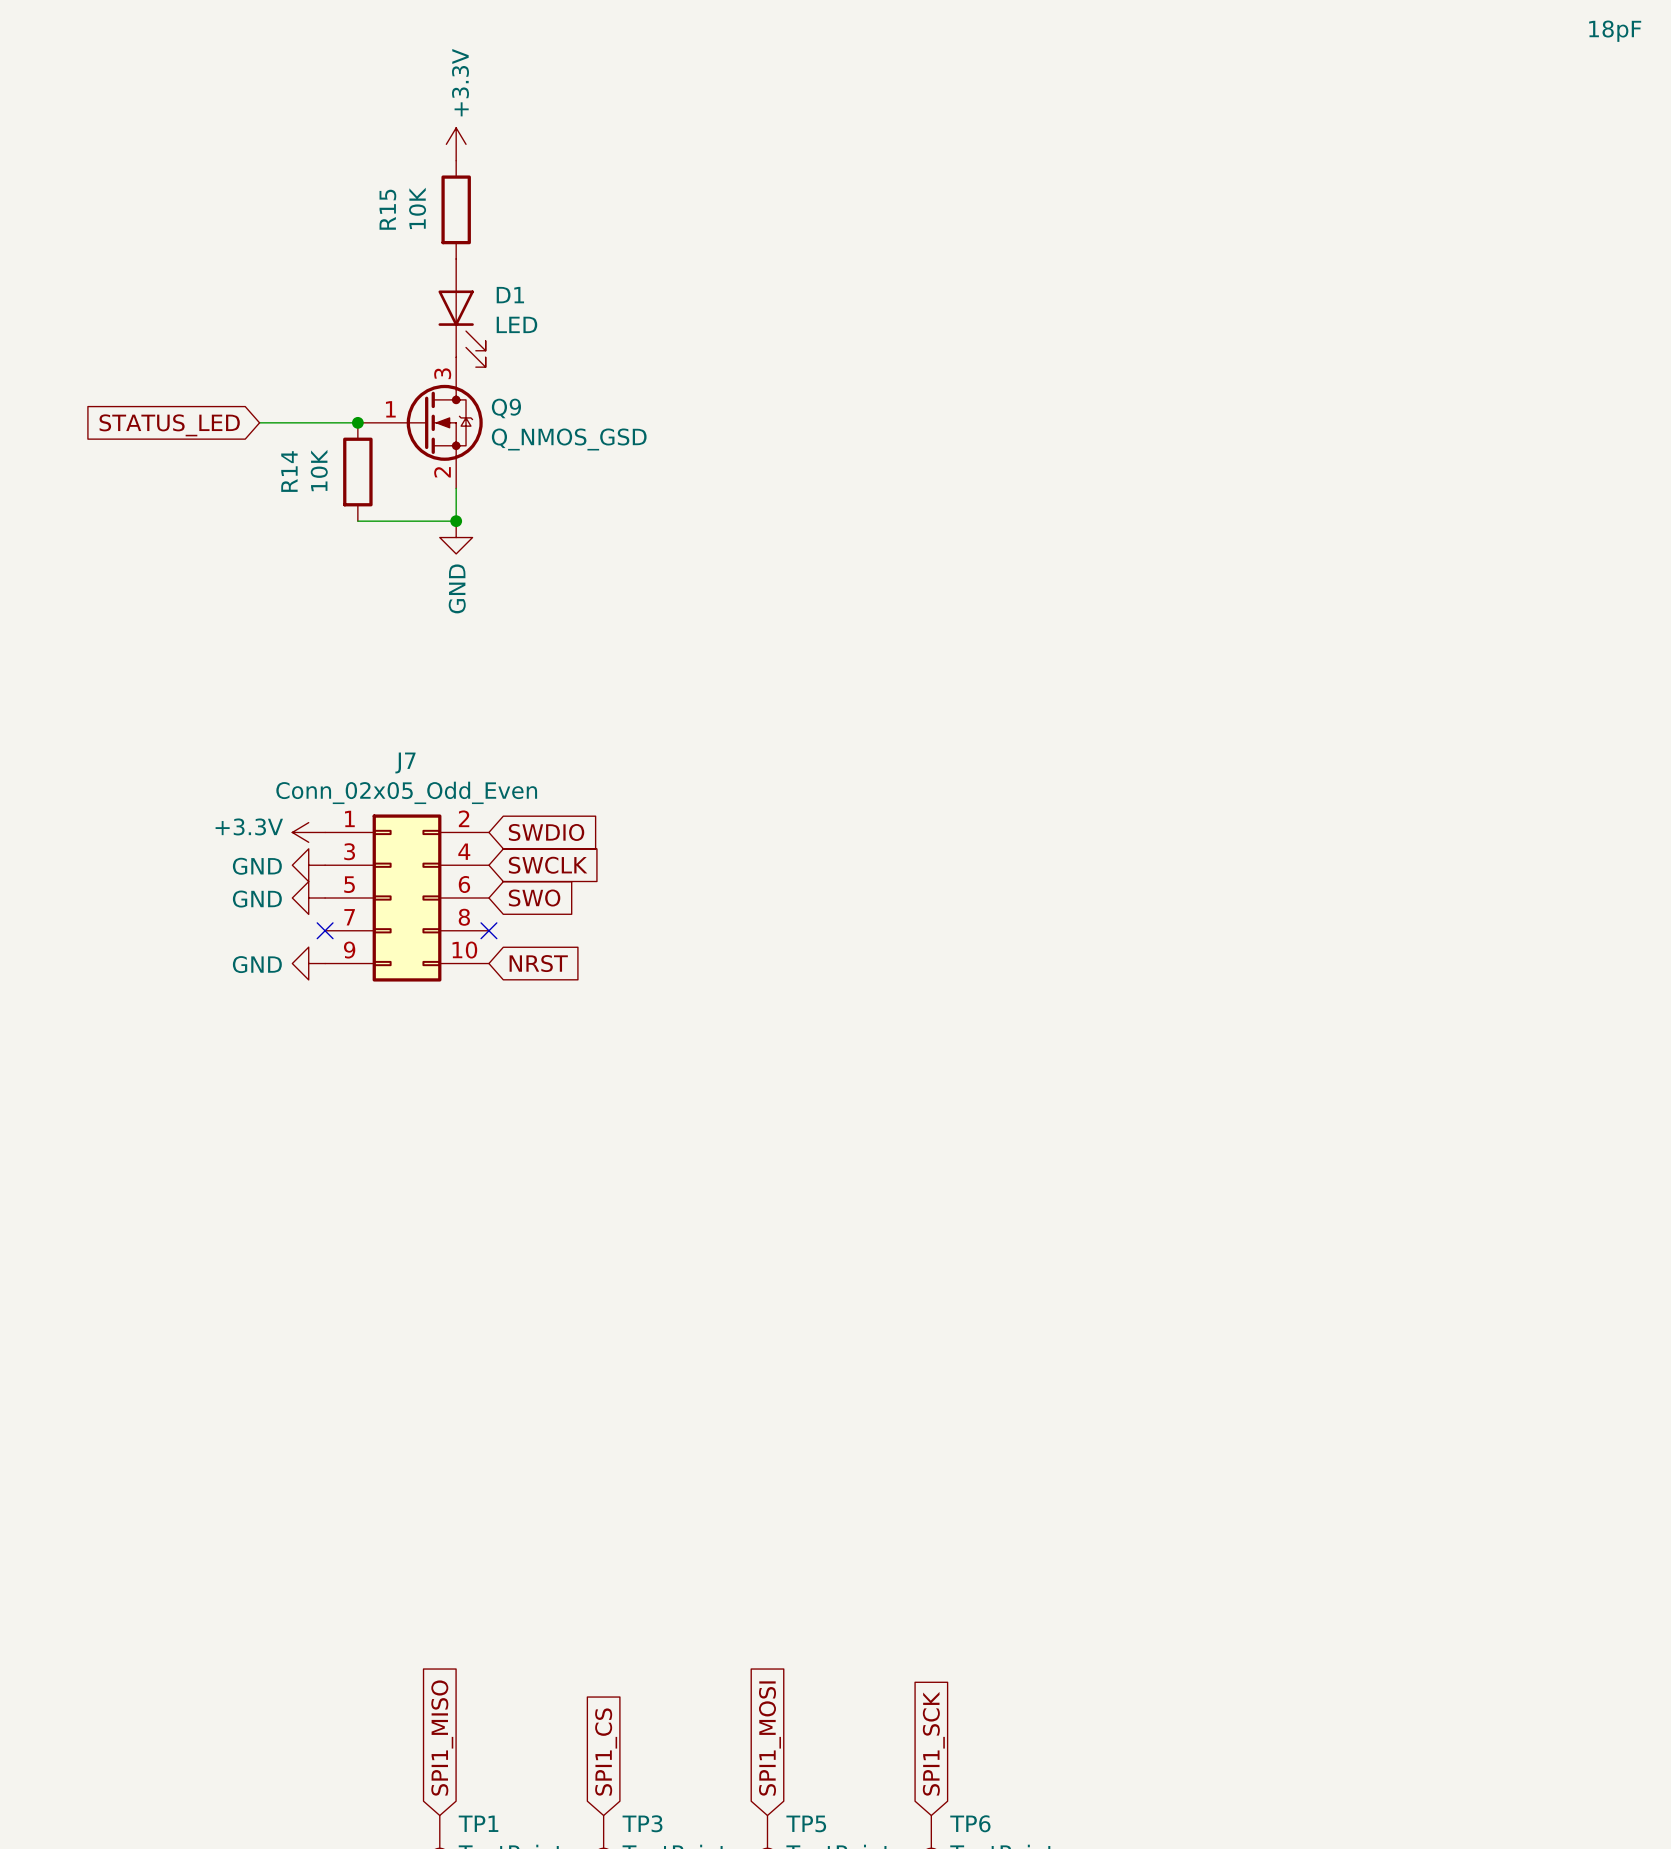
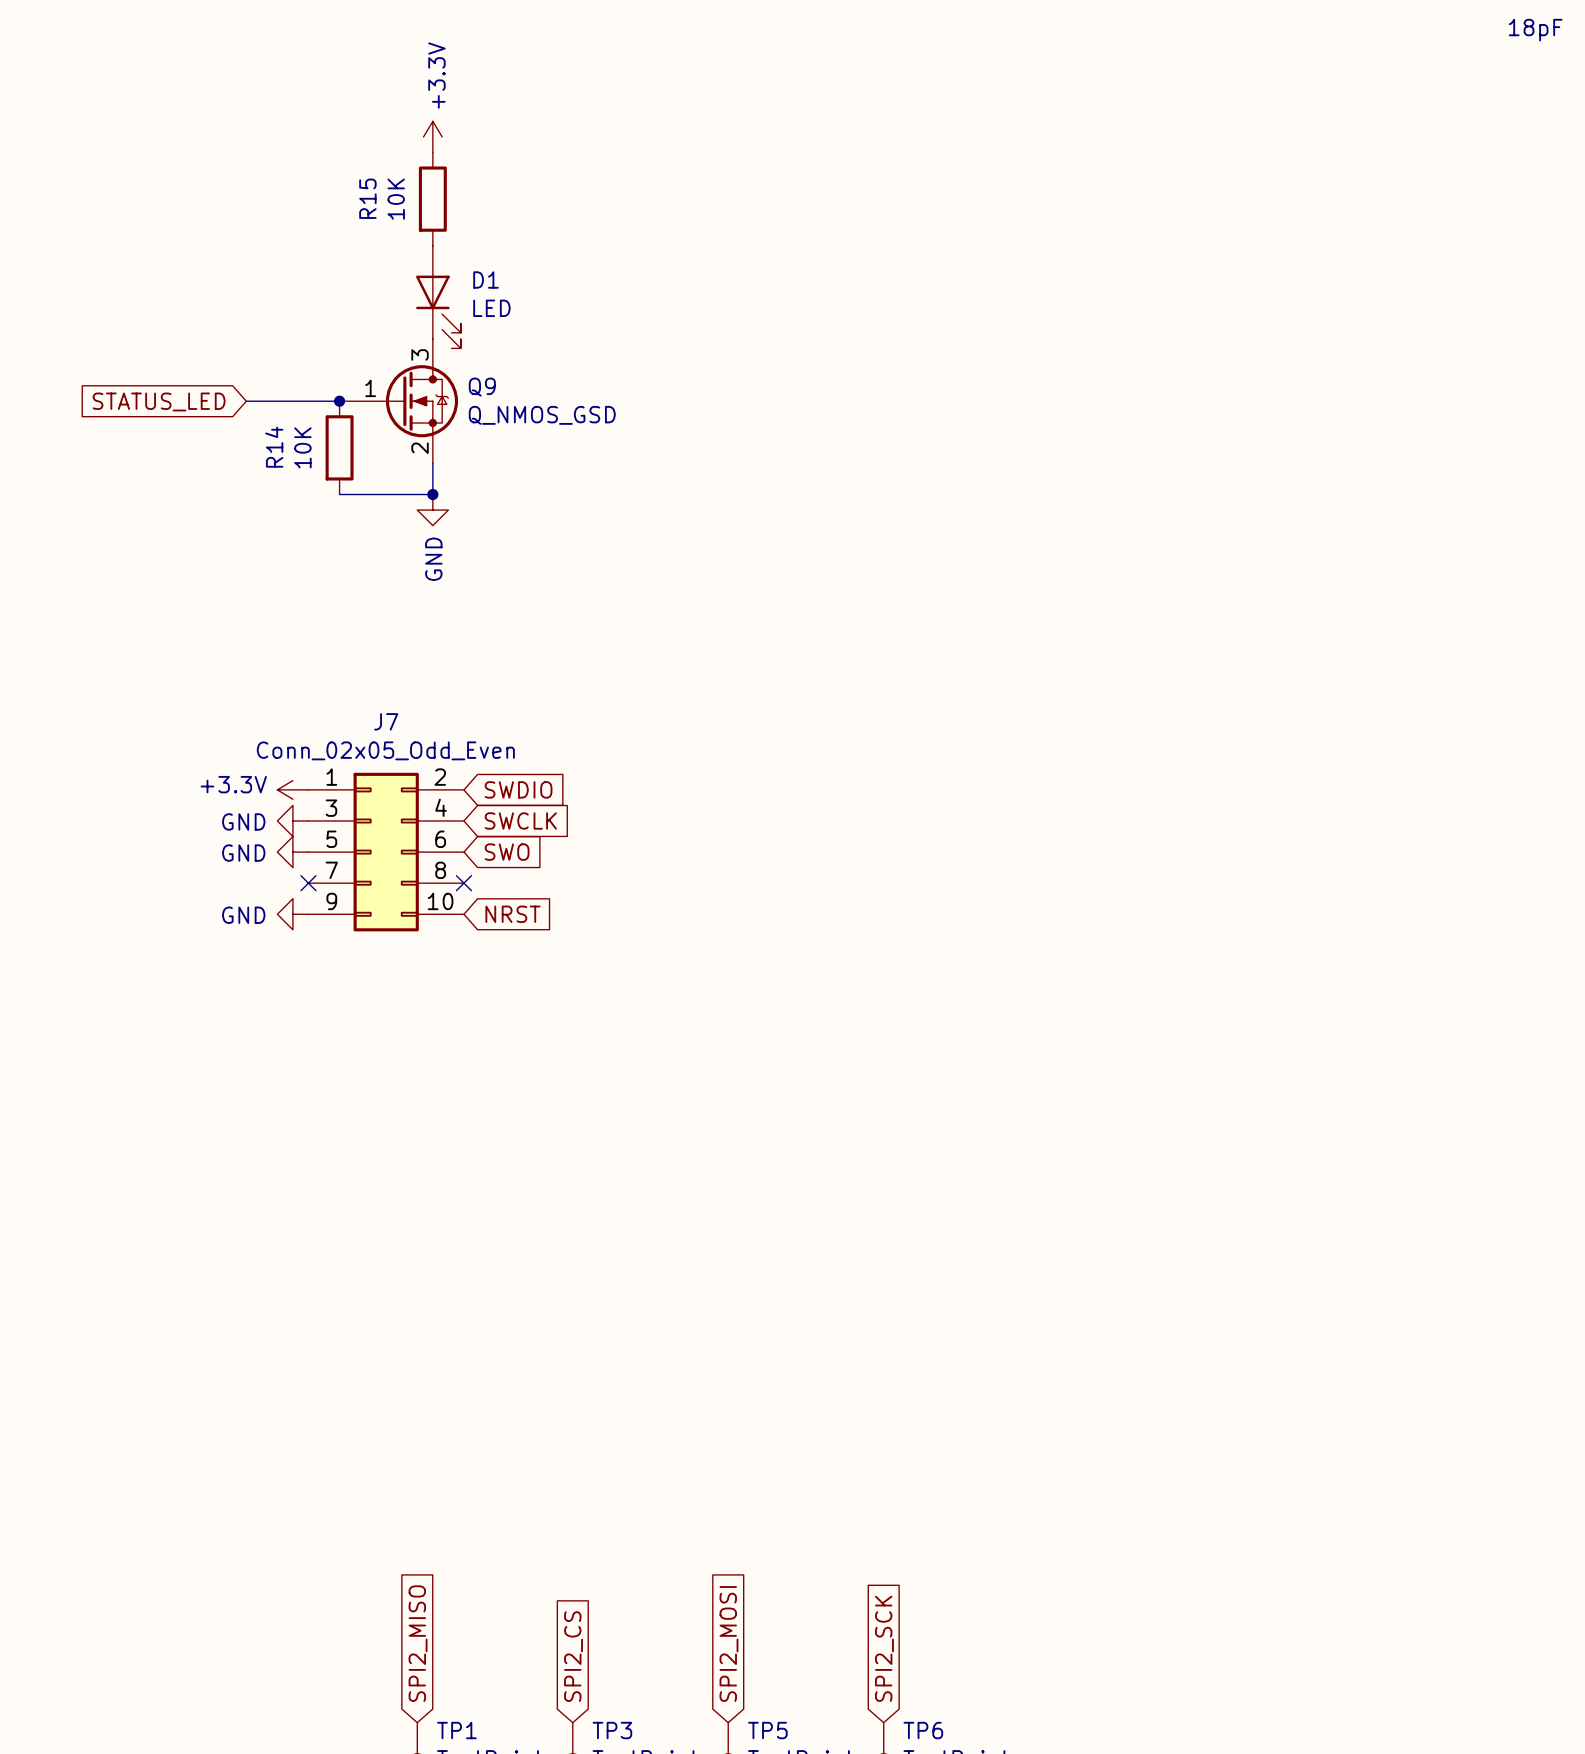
global label: SPI1_MISO (442, 1738) -> SPI2_MISO (418, 1643)
global label: SPI1_MOSI (769, 1738) -> SPI2_MOSI (728, 1644)
global label: SPI1_SCK (933, 1743) -> SPI2_SCK (884, 1648)
global label: SPI1_CS (606, 1752) -> SPI2_CS (573, 1656)

